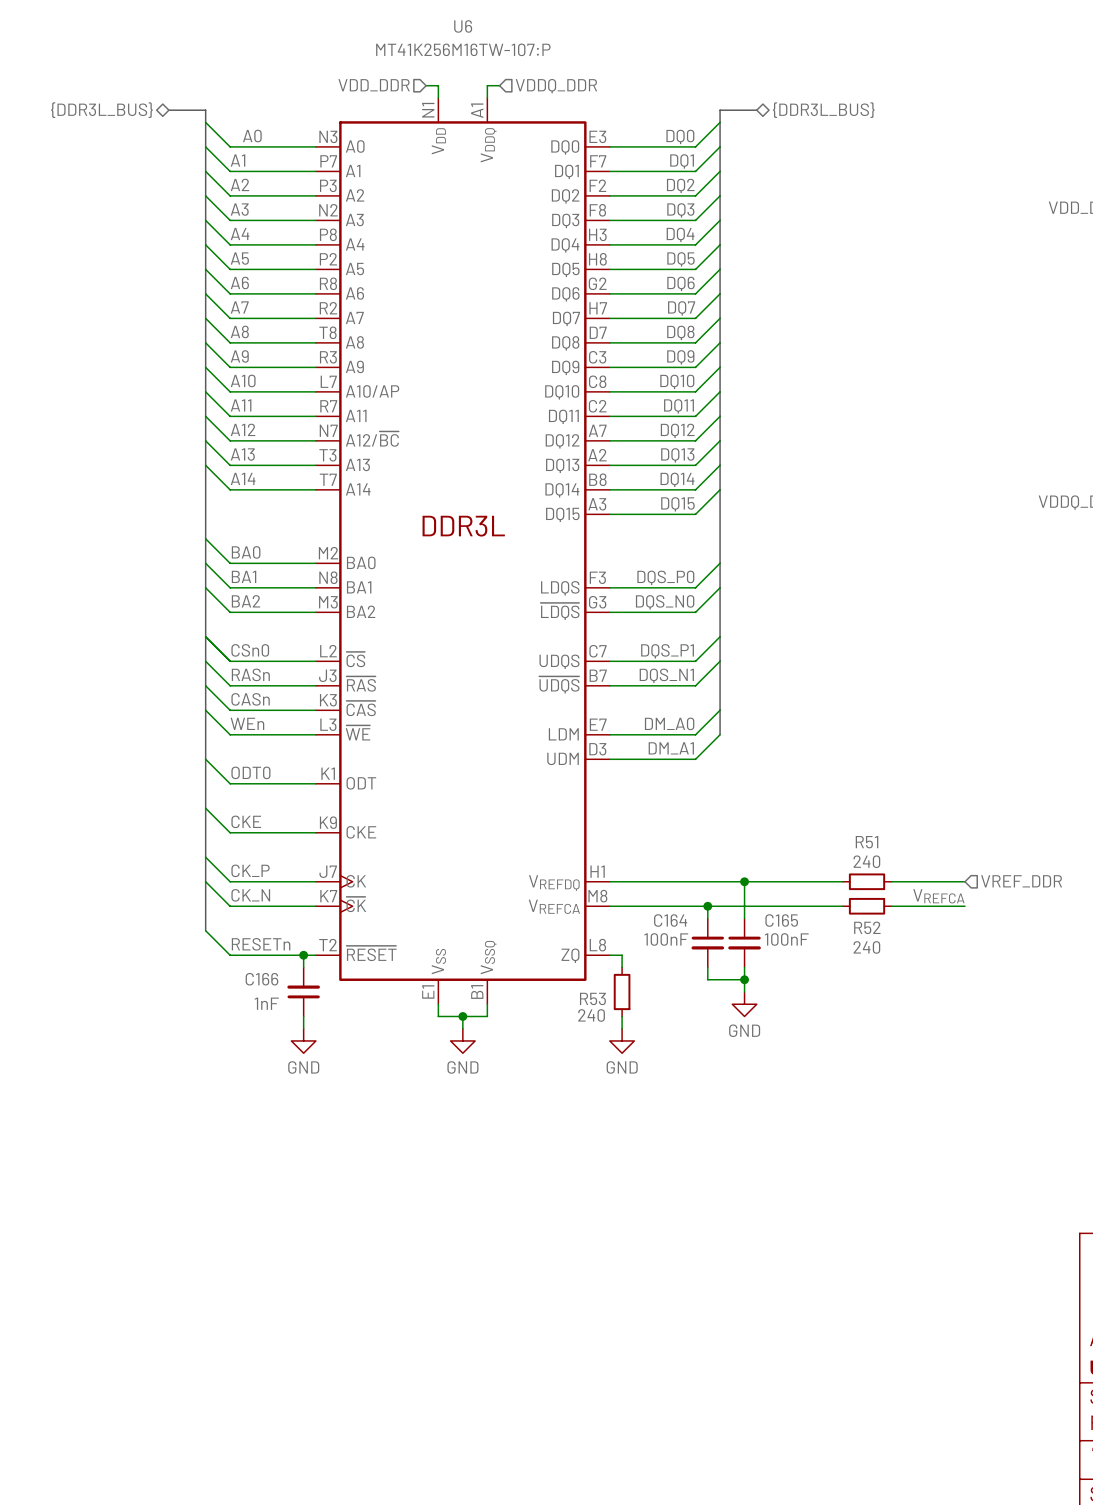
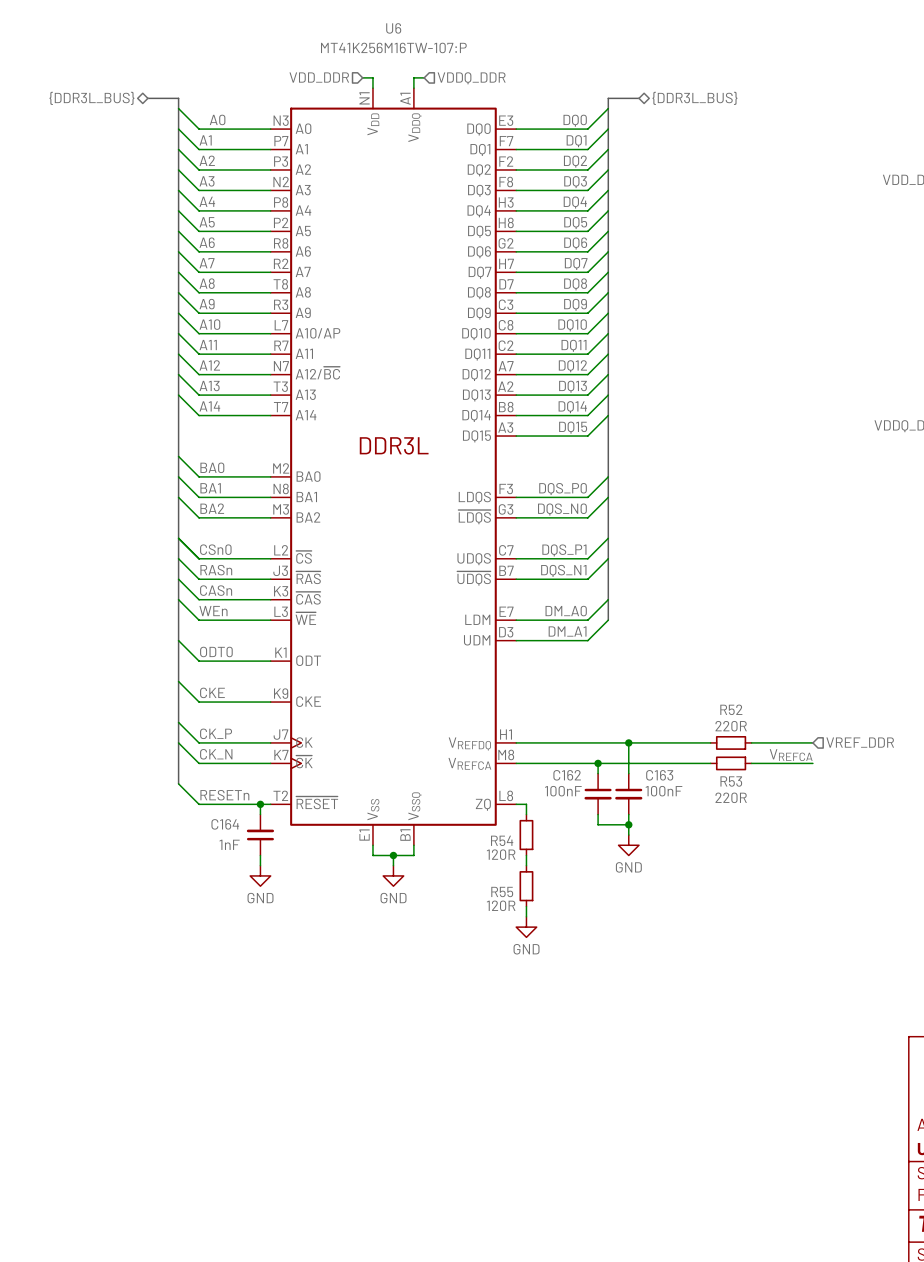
R51 name: R51 (867, 842) -> R52 (731, 709)
R51 value: 240 (866, 861) -> 220R (731, 726)
C164 name: C164 (670, 920) -> C162 (567, 775)
C165 name: C165 (781, 920) -> C163 (659, 775)
R52 name: R52 (867, 927) -> R53 (731, 781)
R52 value: 240 (866, 947) -> 220R (731, 797)
C166 name: C166 (261, 979) -> C164 (225, 824)
R53 name: R53 (592, 998) -> R54 (502, 840)
R53 value: 240 (591, 1015) -> 120R (501, 854)
power symbol position: GND (622, 1040) -> GND (526, 927)
R55: none -> 120R (526, 886)
wire: none -> (526, 906) (526, 916)

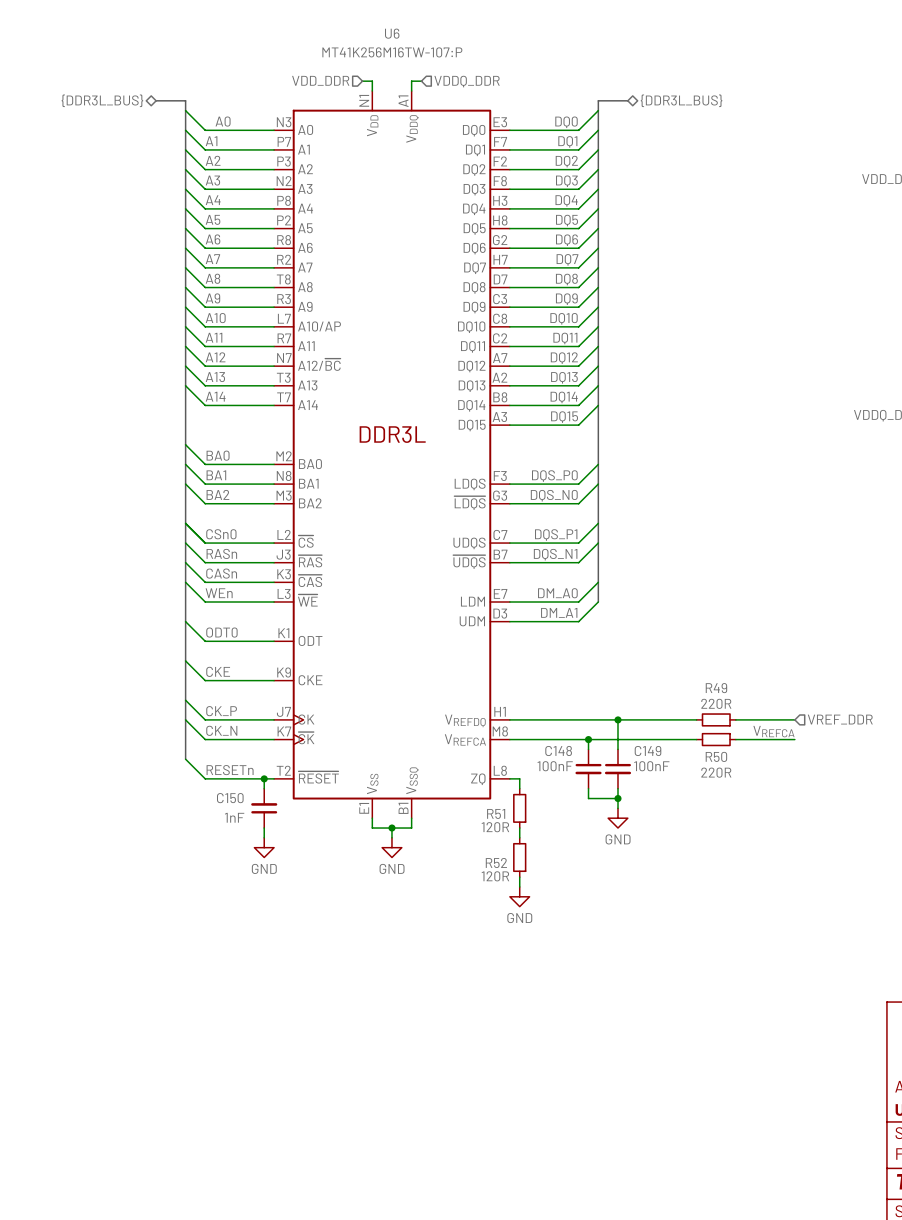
R52 name: R52 (731, 709) -> R49 (716, 688)
C162 name: C162 (567, 775) -> C148 (558, 750)
C163 name: C163 (659, 775) -> C149 (648, 751)
R53 name: R53 (731, 781) -> R50 (716, 756)
C164 name: C164 (225, 824) -> C150 (230, 798)
R54 name: R54 (502, 840) -> R51 (496, 813)
R55 name: R55 (502, 892) -> R52 (496, 863)

